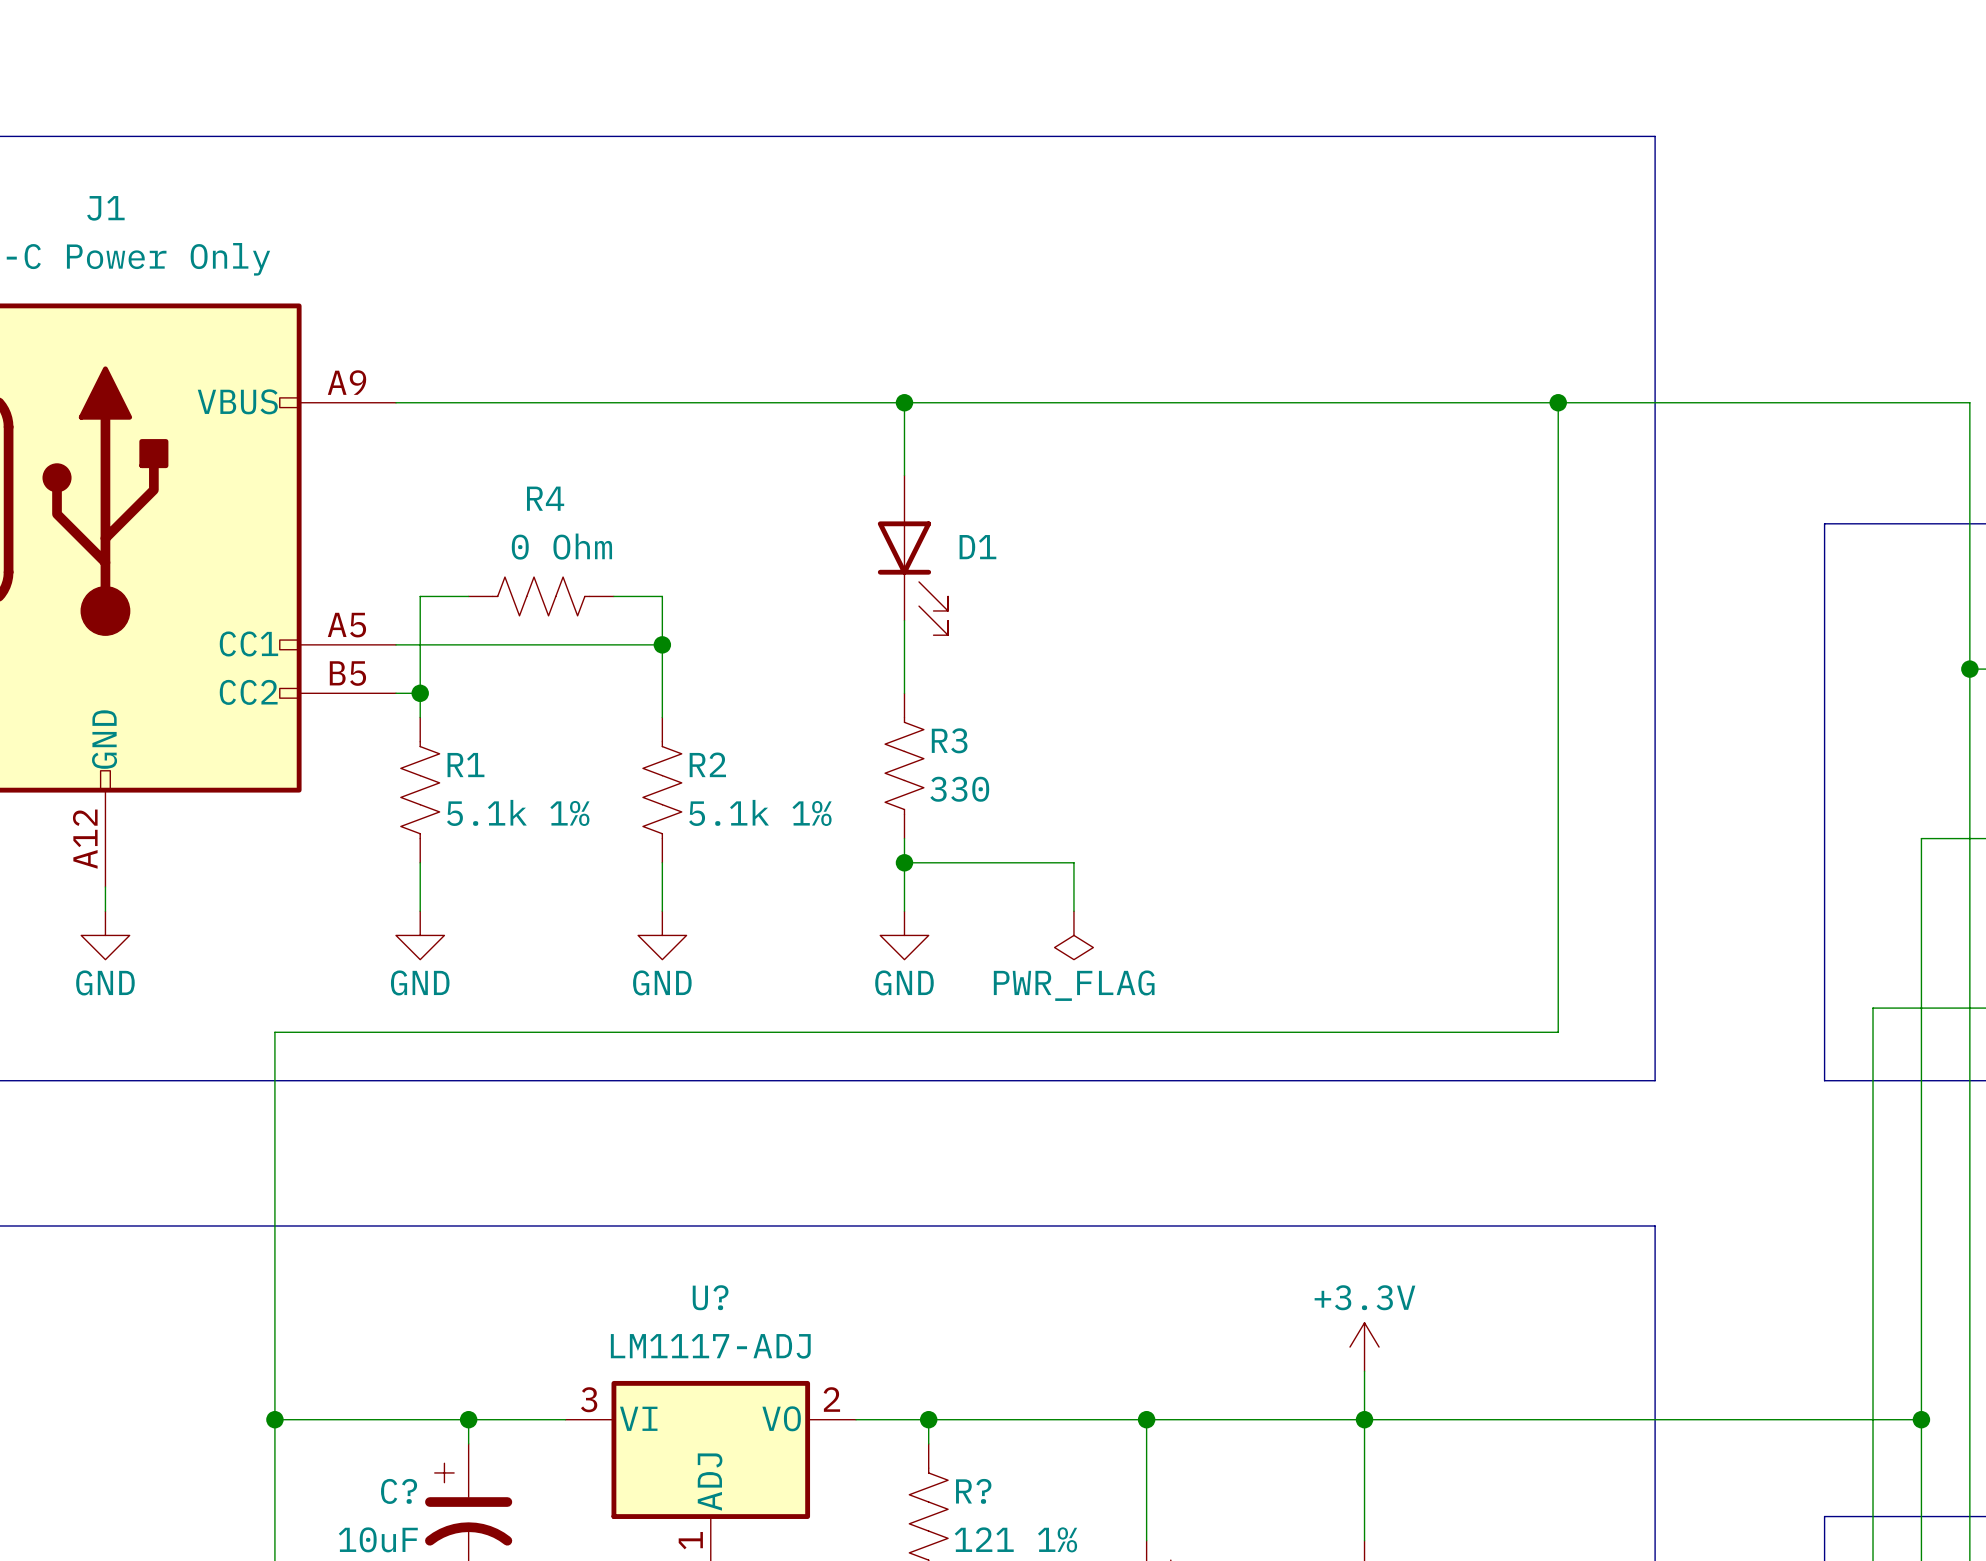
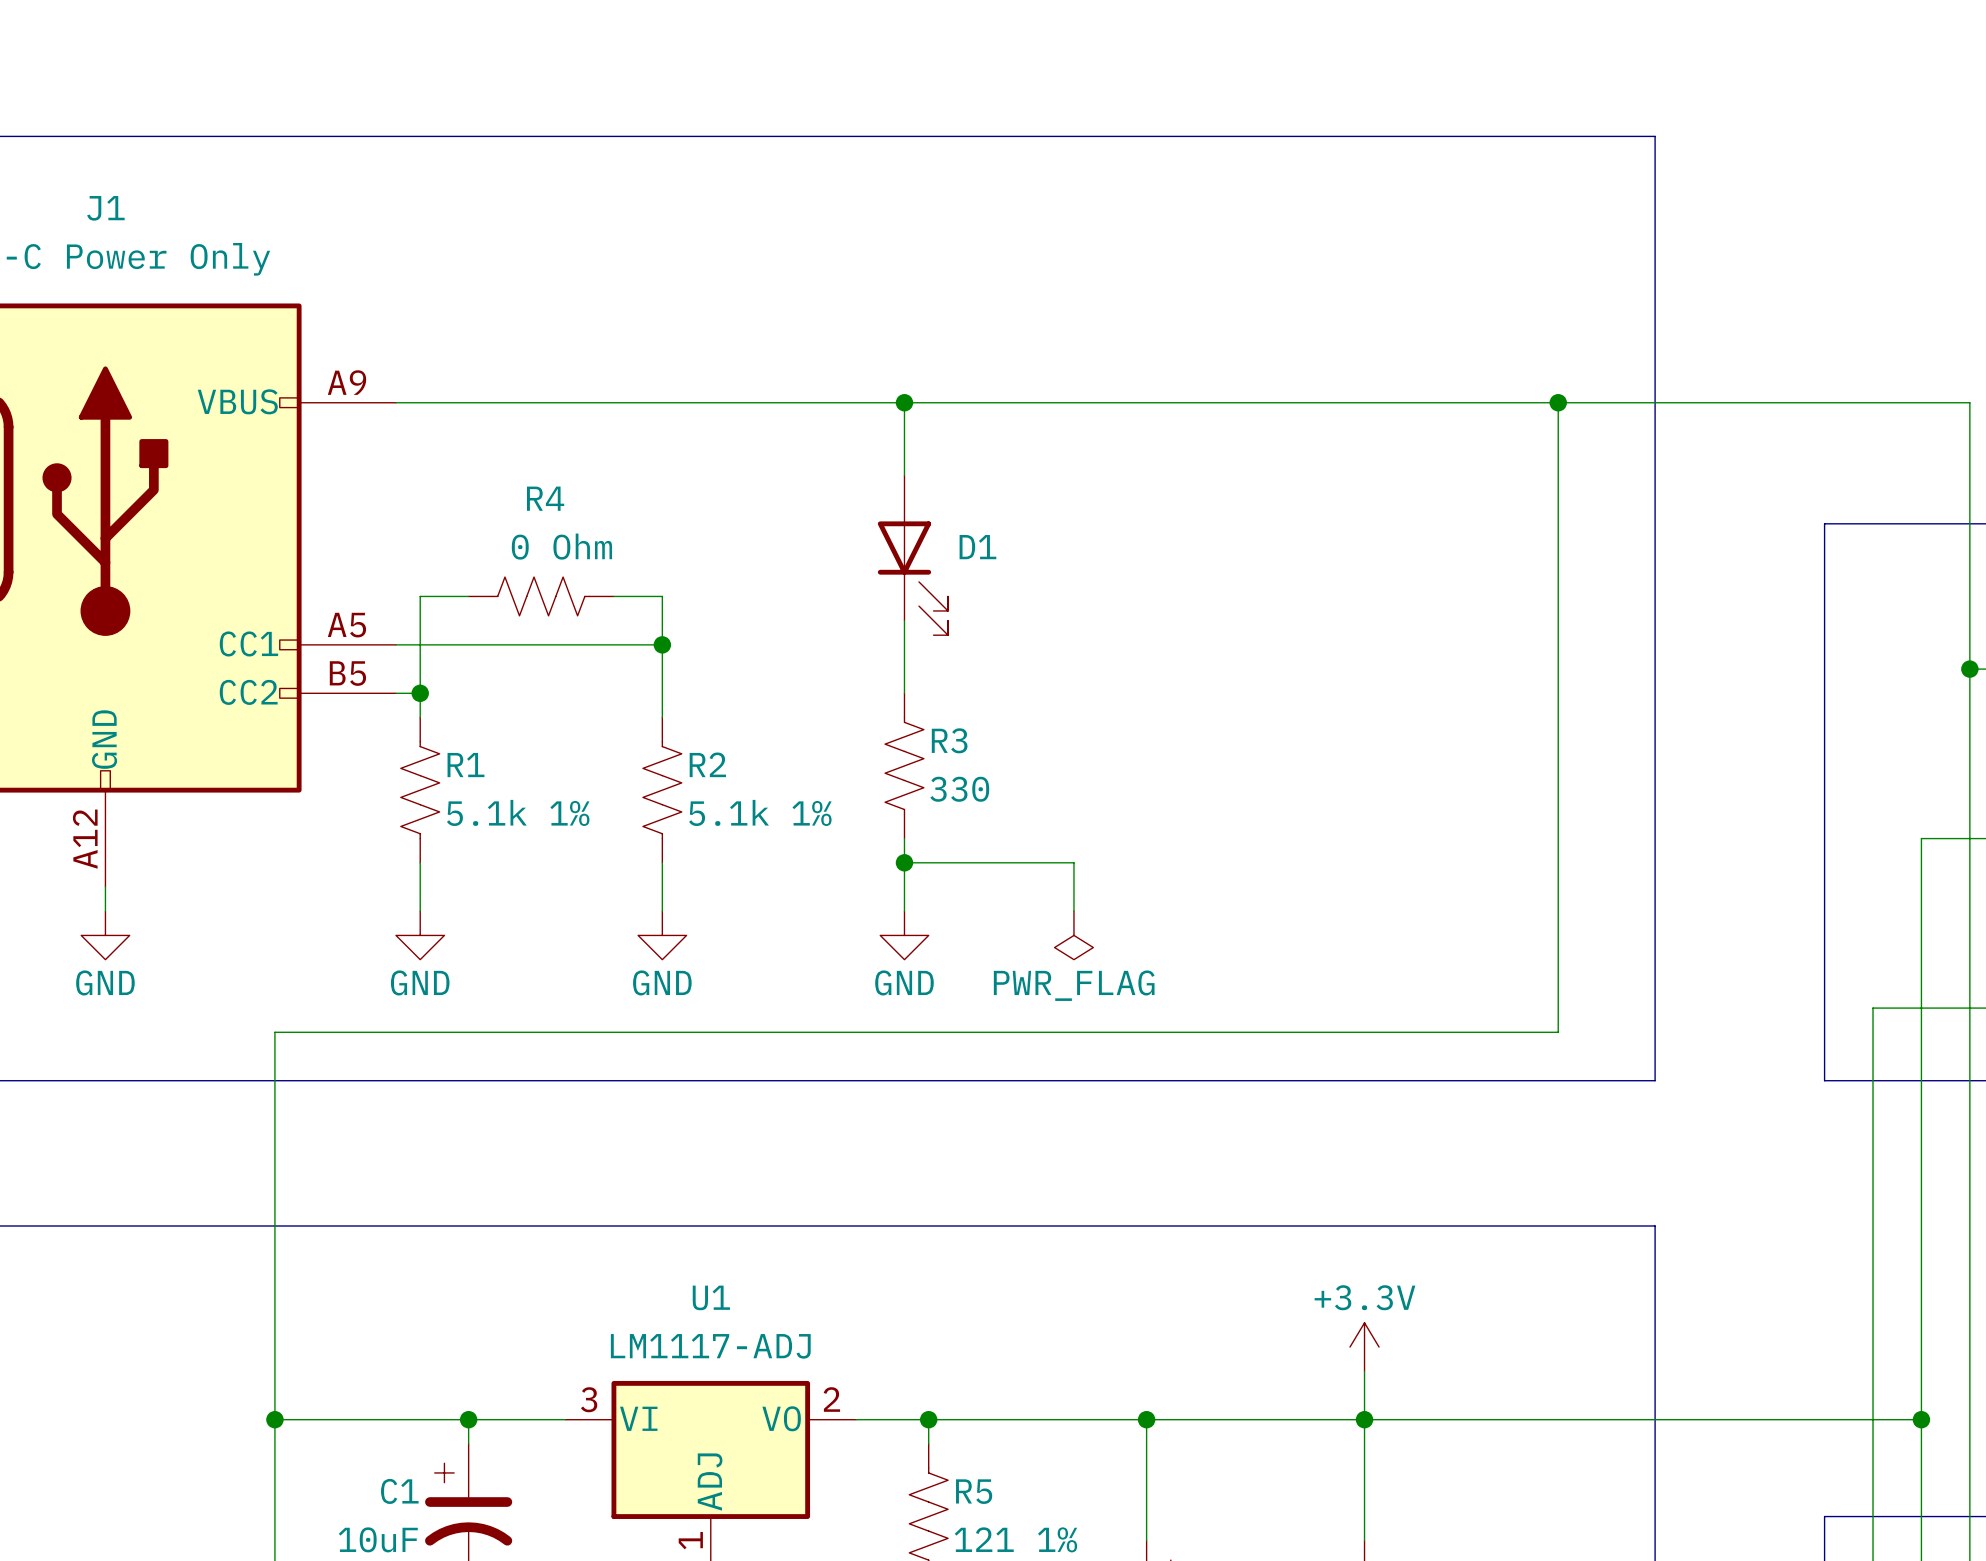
U? name: U? (710, 1297) -> U1 (711, 1297)
C? name: C? (399, 1491) -> C1 (399, 1491)
R? name: R? (973, 1491) -> R5 (974, 1491)

